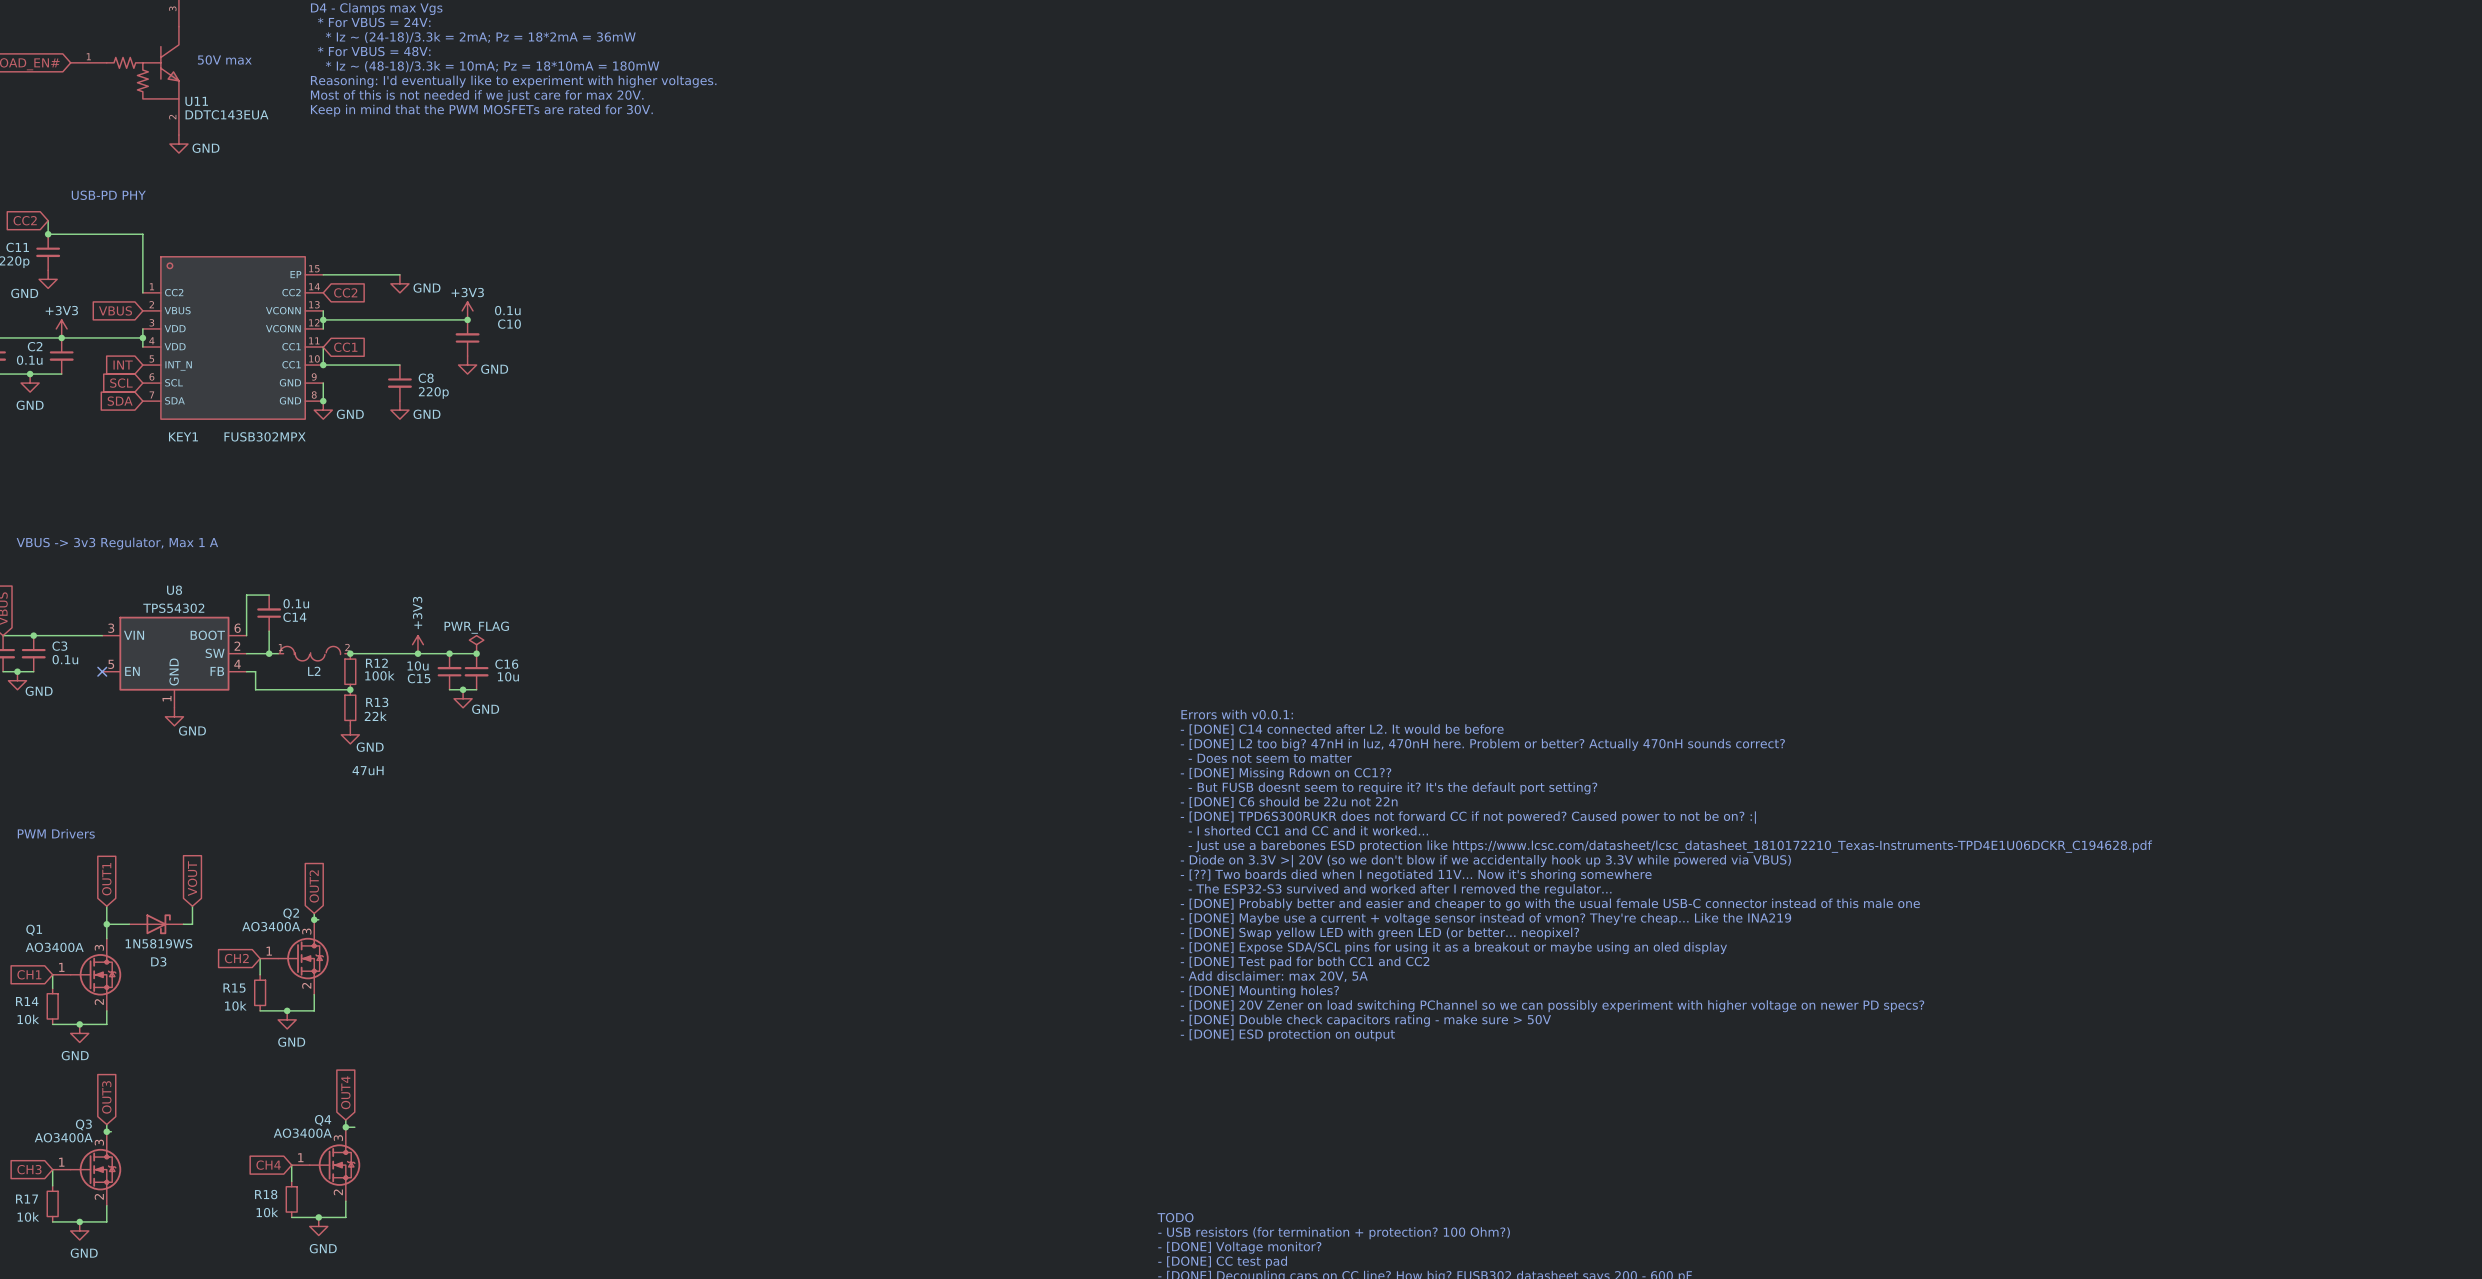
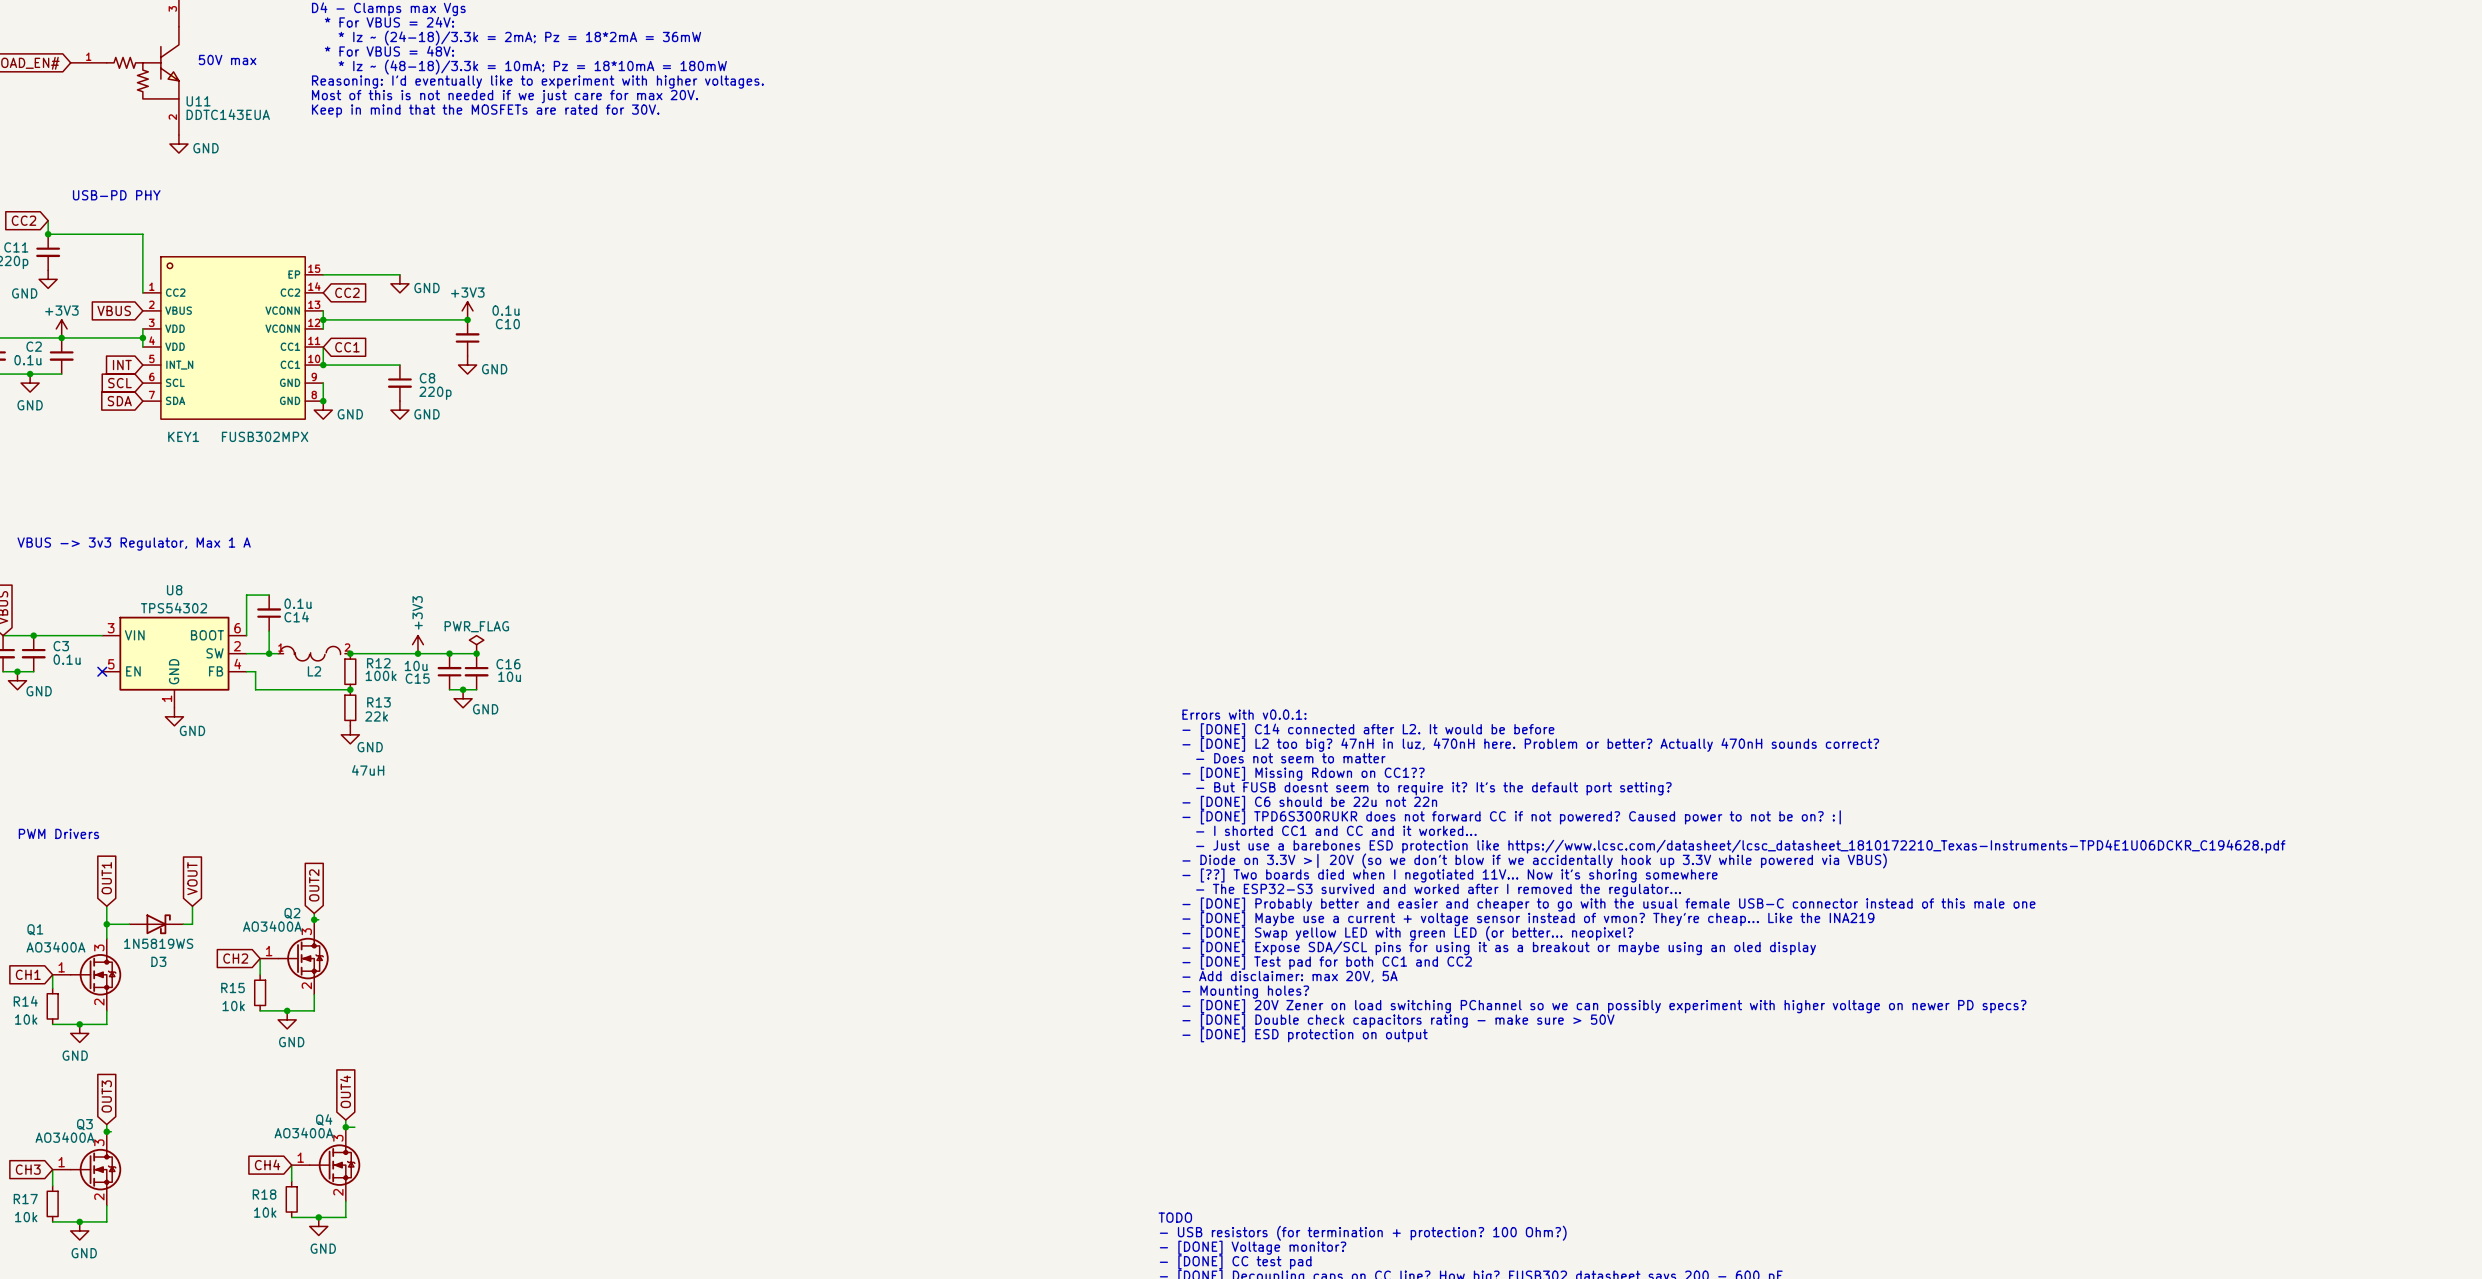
text: Keep in mind that the PWM MOSFETs are rated for 30V. (481, 110) -> Keep in mind that the MOSFETs are rated for 30V. (485, 111)
text: - [DONE] Mounting holes? (1259, 991) -> - Mounting holes? (1245, 992)

